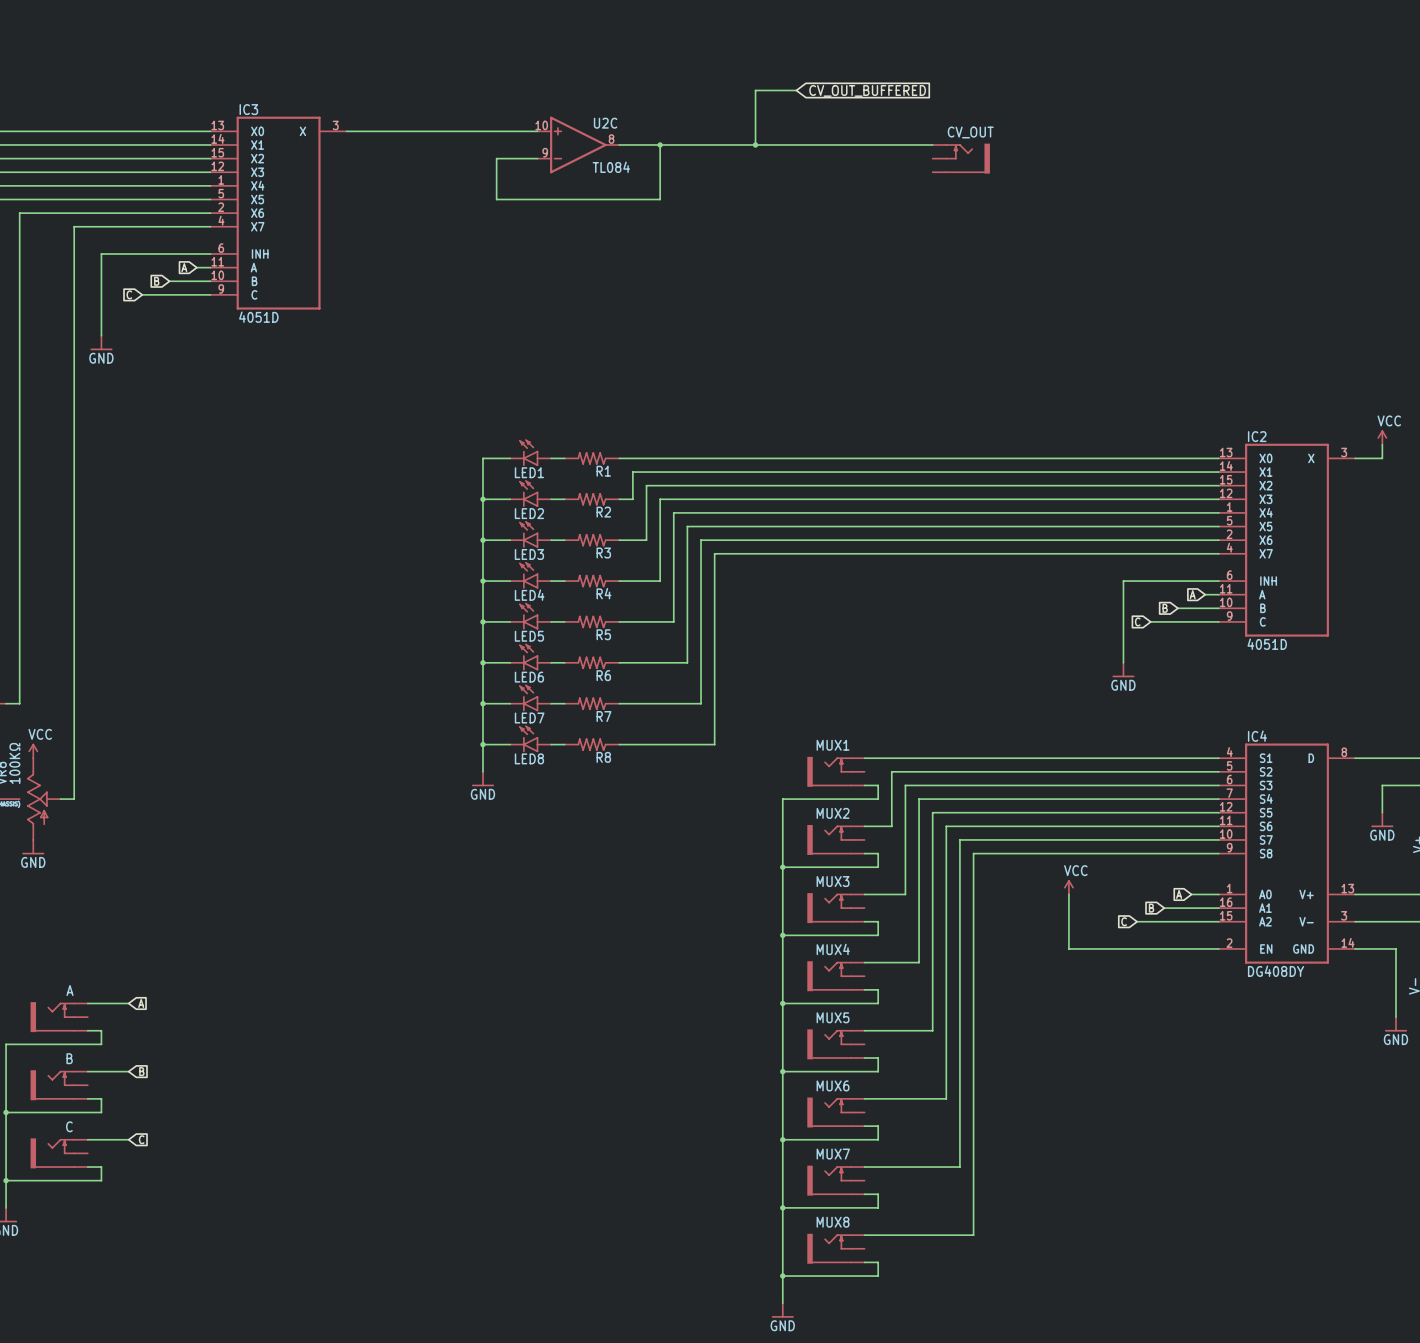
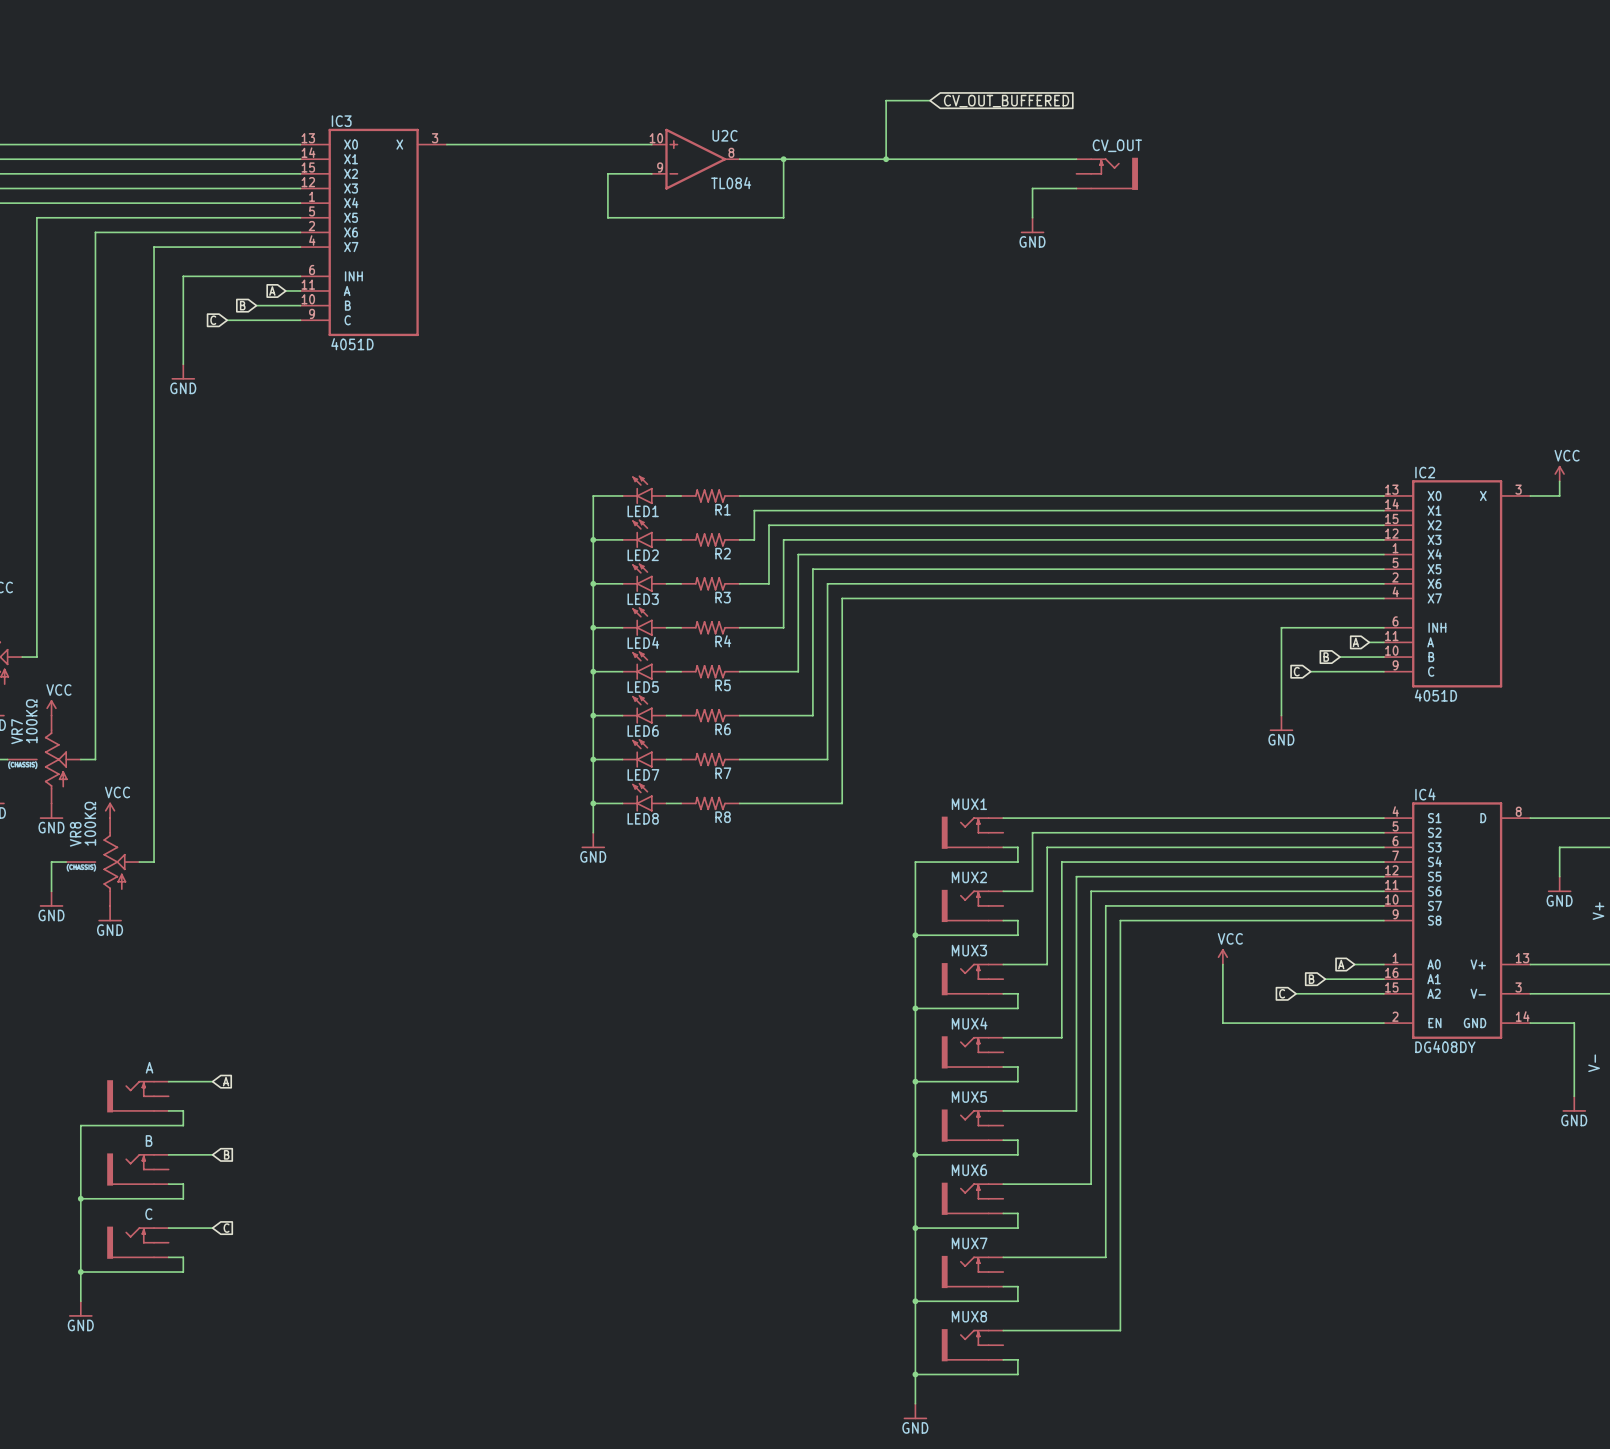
wire: none -> (1076, 188) (1032, 188) (1032, 217)
power symbol: none -> GND (1032, 225)

